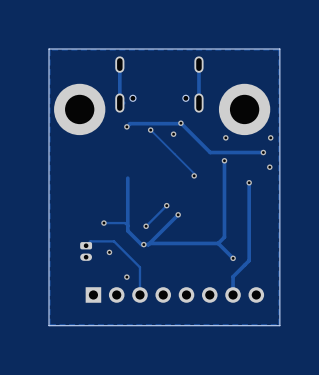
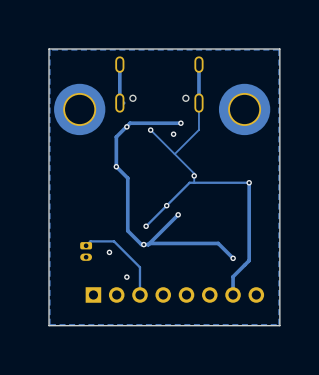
track: none -> (198, 103) (198, 129) (174, 154)
track: none -> (180, 123) (130, 123) (116, 136) (116, 166) (127, 178)
track: (126, 126) (130, 123) (180, 123) (210, 152) (263, 152) -> none
via: (225, 137) -> none
via: (270, 137) -> none
via: (263, 152) -> none
track: (224, 160) (224, 237) (218, 243) -> none
via: (224, 160) -> none
via: none -> (116, 166)
via: (269, 167) -> none
track: none -> (194, 175) (194, 182)
track: none -> (249, 182) (189, 182) (166, 205)
track: (103, 223) (125, 223) (127, 225) -> none
via: (103, 223) -> none

